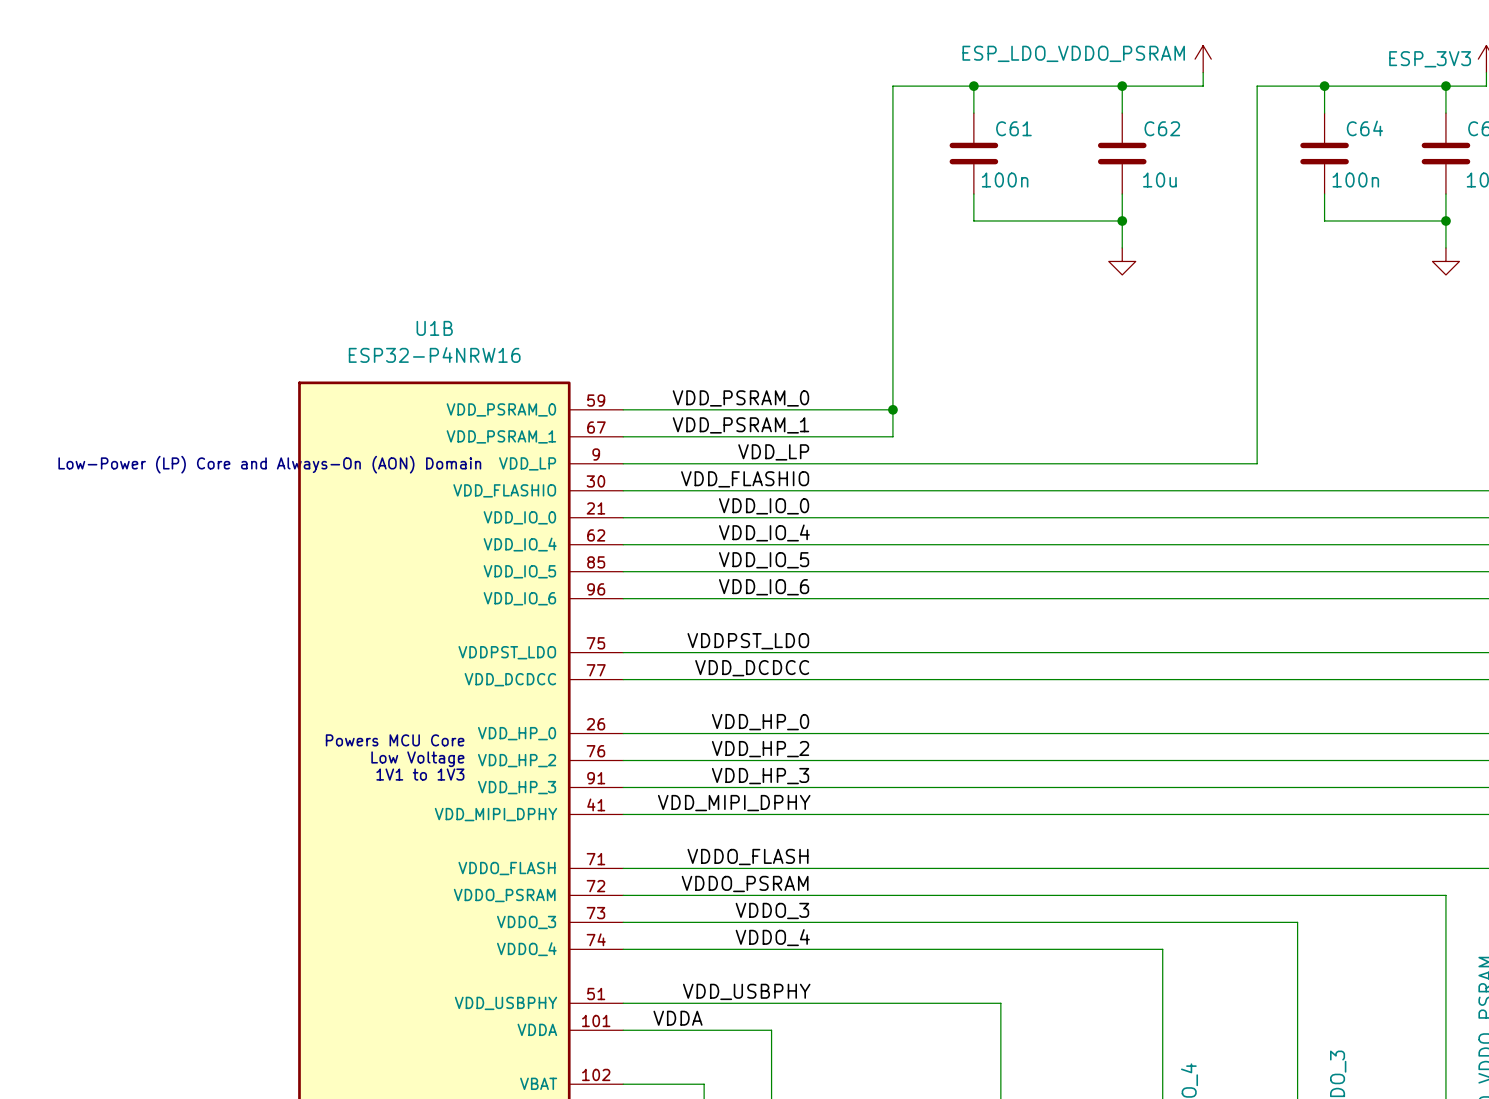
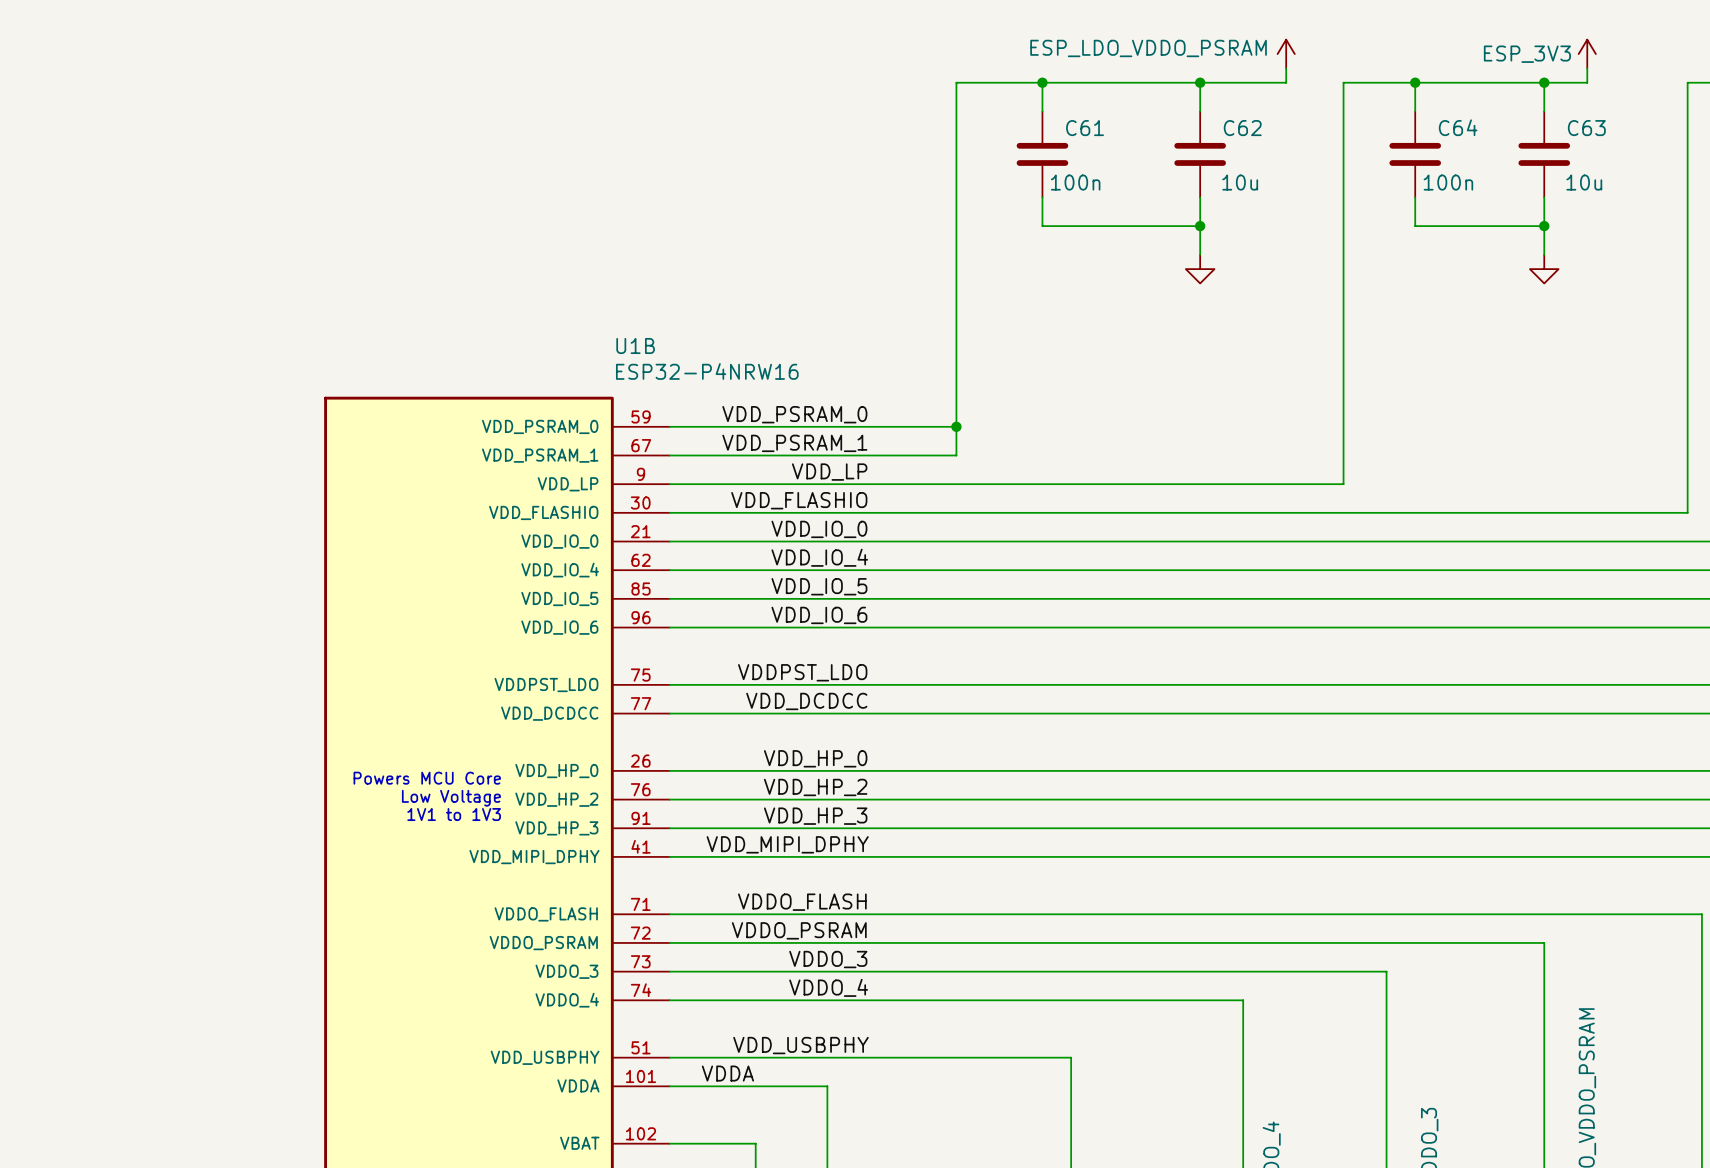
U1B name position: U1B (434, 328) -> U1B (635, 345)
U1B value position: ESP32-P4NRW16 (434, 355) -> ESP32-P4NRW16 (707, 371)
text: Low-Power (LP) Core and Always-On (AON) Domain (269, 464) -> none

